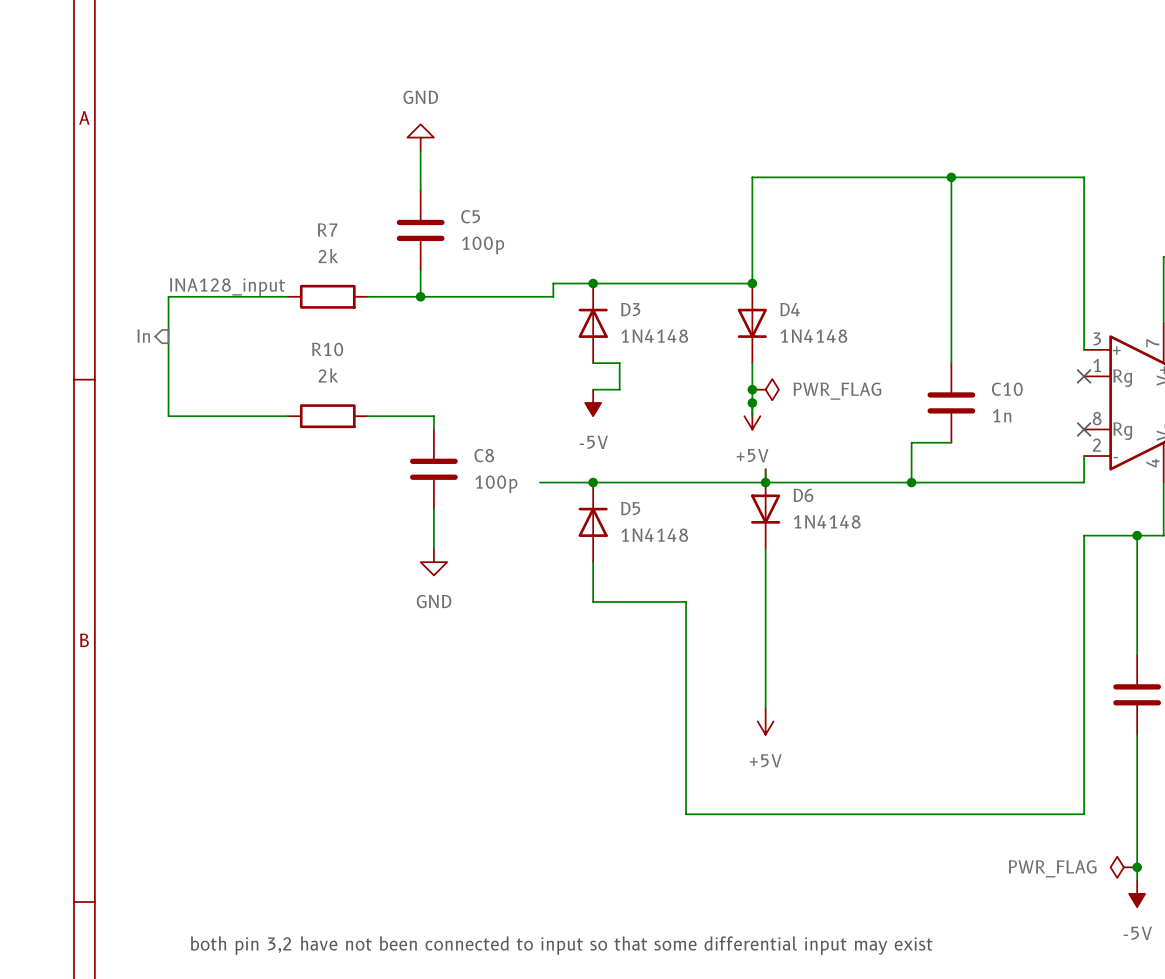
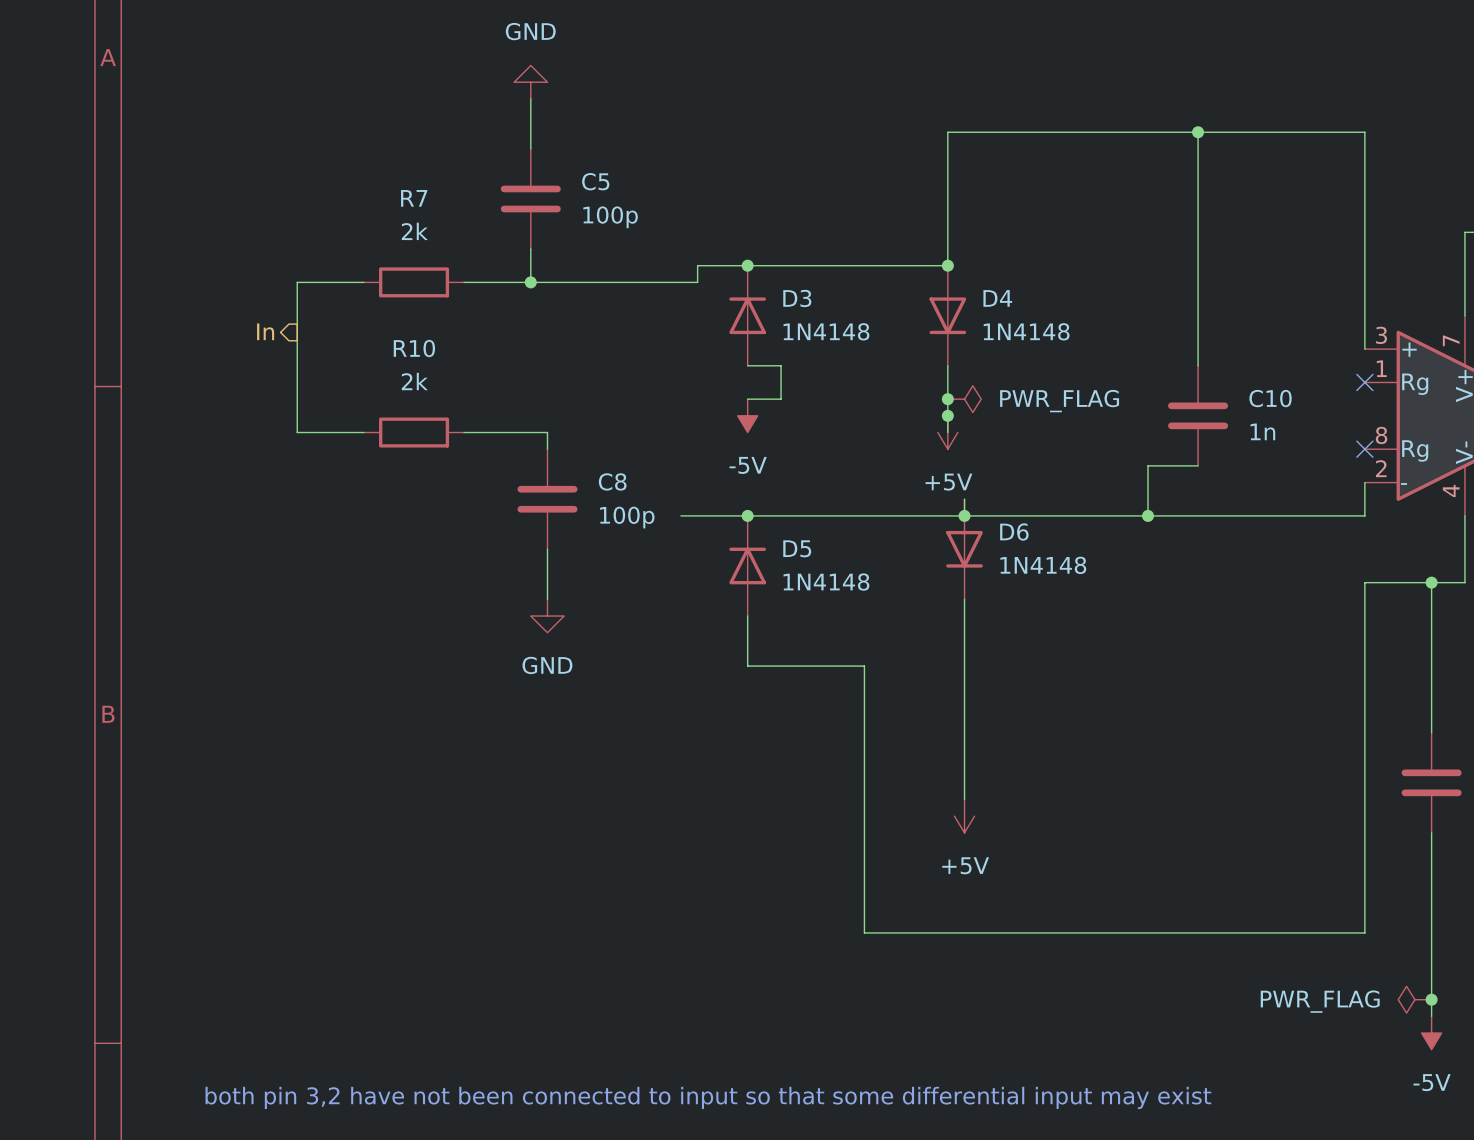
label: INA128_input (227, 287) -> none
wire: (234, 296) (168, 296) (168, 416) (234, 416) -> (297, 282) (297, 432)
hierarchical label position: In (143, 336) -> In (265, 331)

